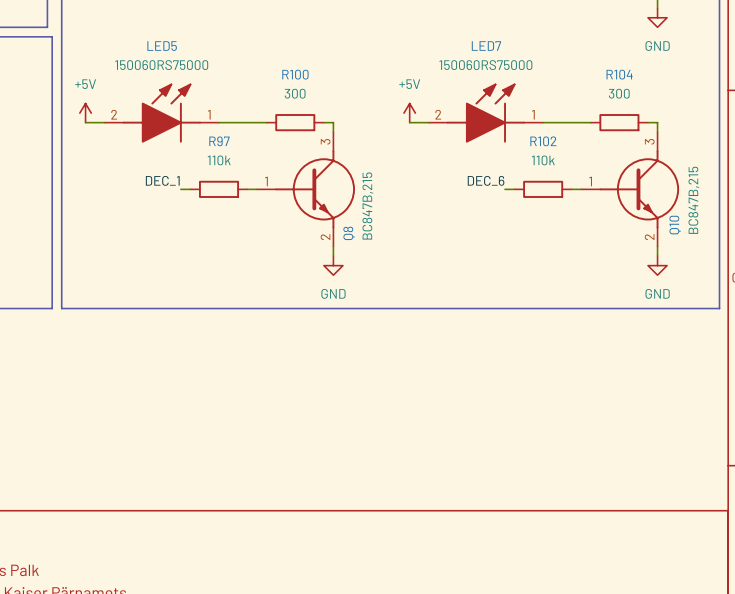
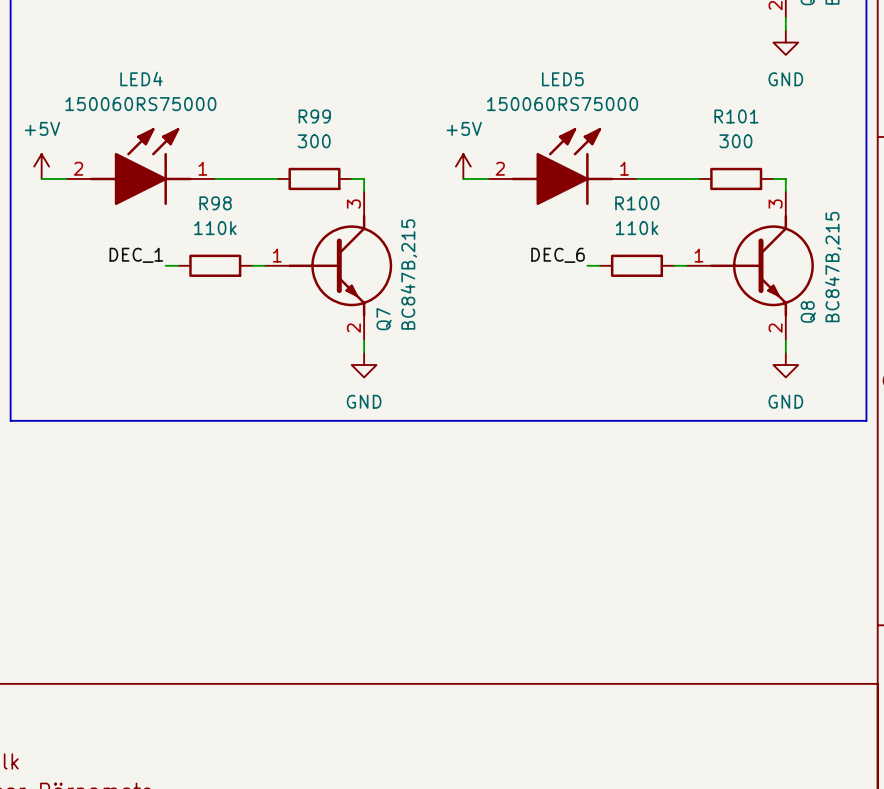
LED5 name: LED5 (162, 46) -> LED4 (141, 78)
LED7 name: LED7 (486, 46) -> LED5 (562, 79)
R100 name: R100 (295, 74) -> R99 (314, 116)
R104 name: R104 (619, 74) -> R101 (736, 116)
R97 name: R97 (219, 141) -> R98 (215, 203)
R102 name: R102 (543, 141) -> R100 (637, 203)
Q10 name: Q10 (675, 225) -> Q8 (808, 311)
Q8 name: Q8 (349, 233) -> Q7 (384, 319)

